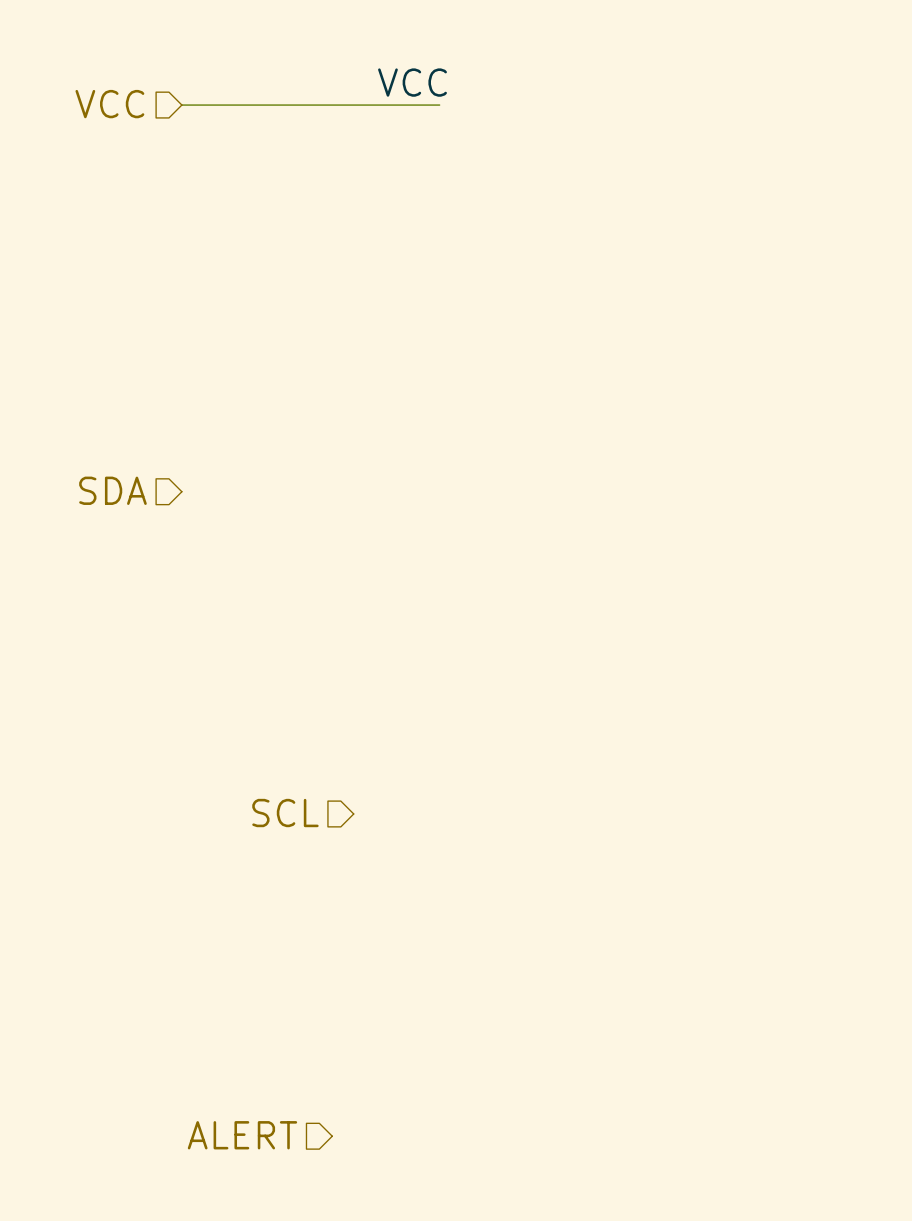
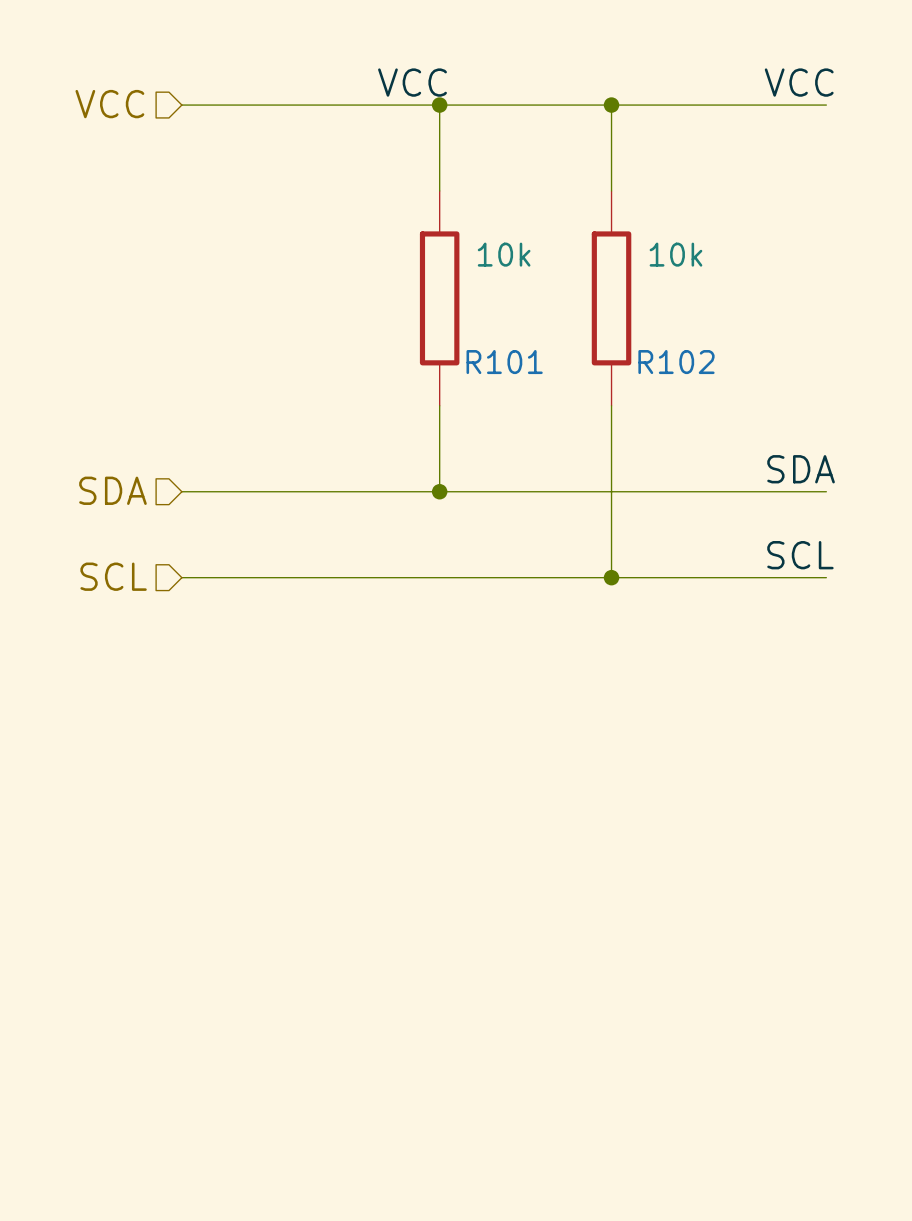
label: none -> VCC (799, 82)
junction: none -> (439, 105)
wire: none -> (611, 105) (611, 190)
junction: none -> (611, 105)
wire: none -> (826, 105) (439, 105) (439, 190)
R101: none -> 10k (439, 298)
R102: none -> 10k (611, 298)
wire: none -> (439, 405) (439, 491)
wire: none -> (611, 405) (611, 577)
label: none -> SDA (801, 469)
wire: none -> (181, 491) (826, 491)
junction: none -> (439, 491)
label: none -> SCL (800, 555)
wire: none -> (181, 577) (826, 577)
junction: none -> (611, 577)
hierarchical label position: SCL (285, 813) -> SCL (113, 576)
hierarchical label: ALERT (242, 1135) -> none

